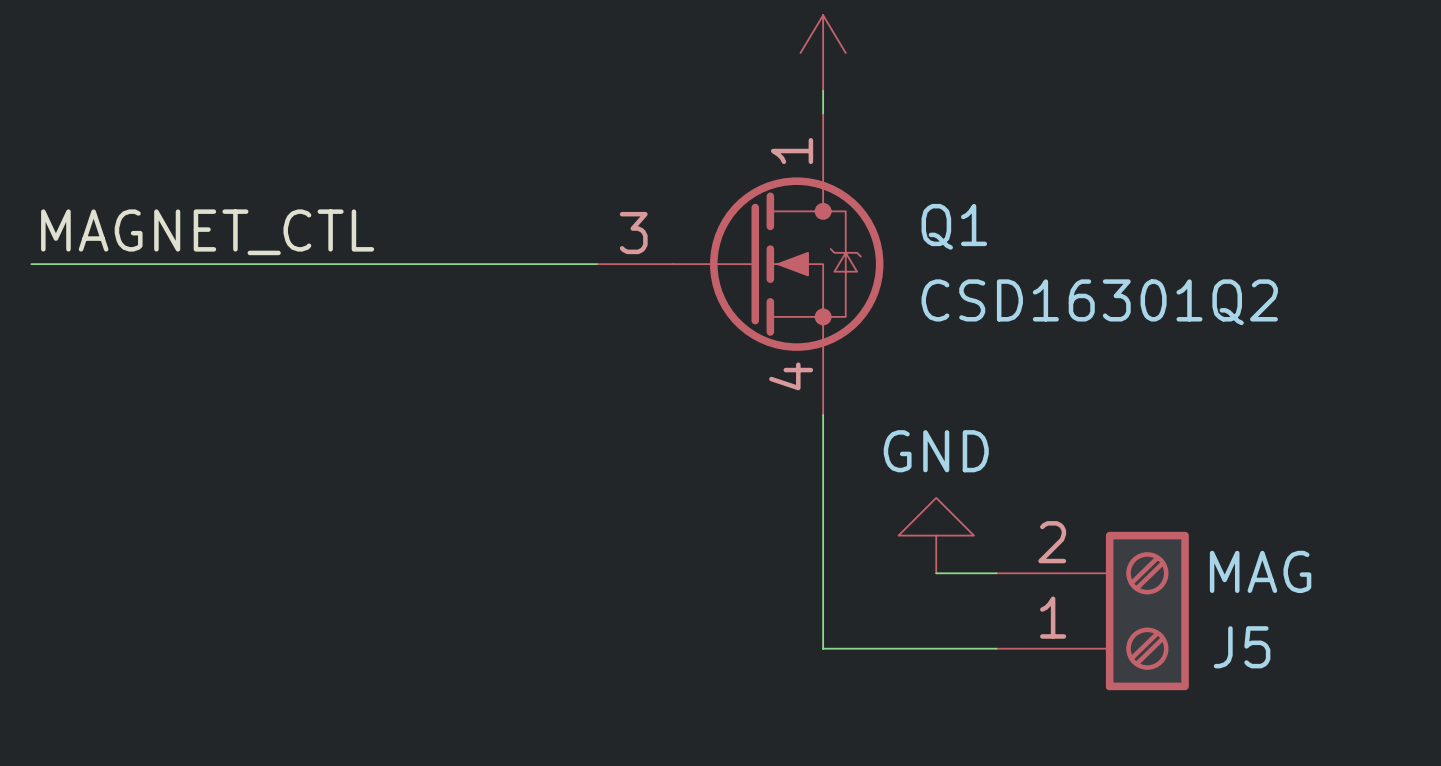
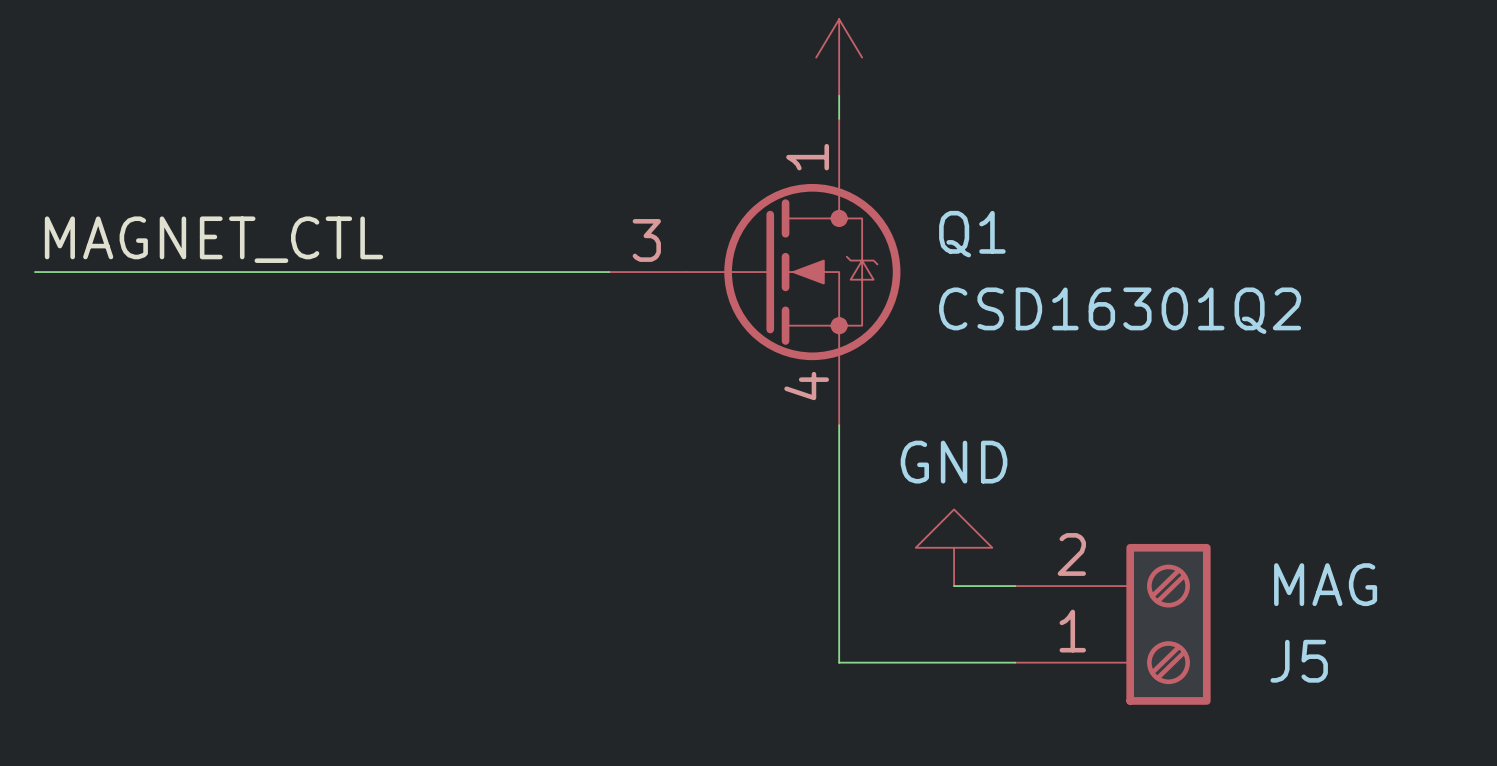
J5 value position: MAG (1260, 571) -> MAG (1325, 584)
J5 name position: J5 (1242, 647) -> J5 (1299, 661)

